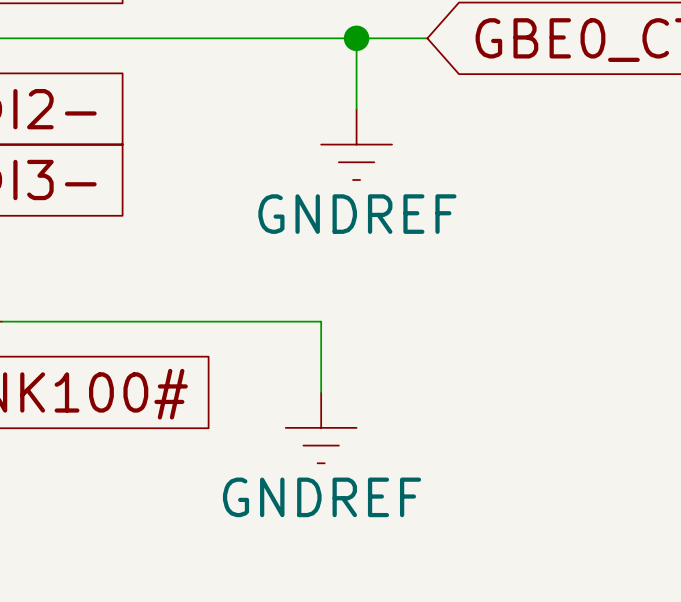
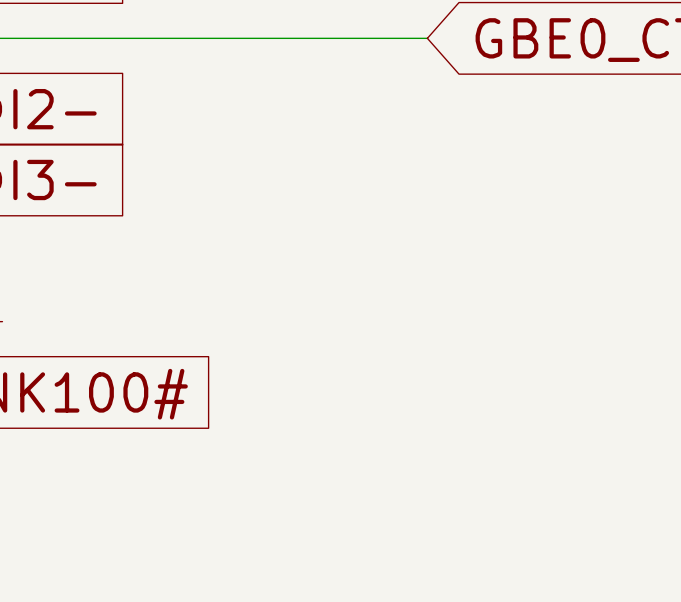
wire: (356, 38) (356, 109) -> none
junction: (356, 38) -> none
power symbol: GNDREF (356, 144) -> none
wire: (2, 321) (321, 321) (321, 392) -> none
power symbol: GNDREF (321, 427) -> none

